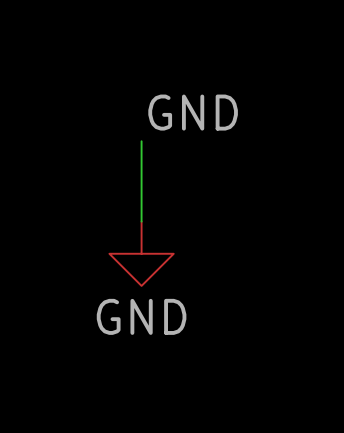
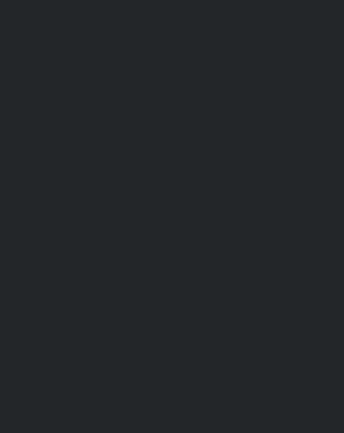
label: GND (193, 112) -> none
wire: (141, 141) (141, 221) -> none
power symbol: GND (141, 253) -> none

